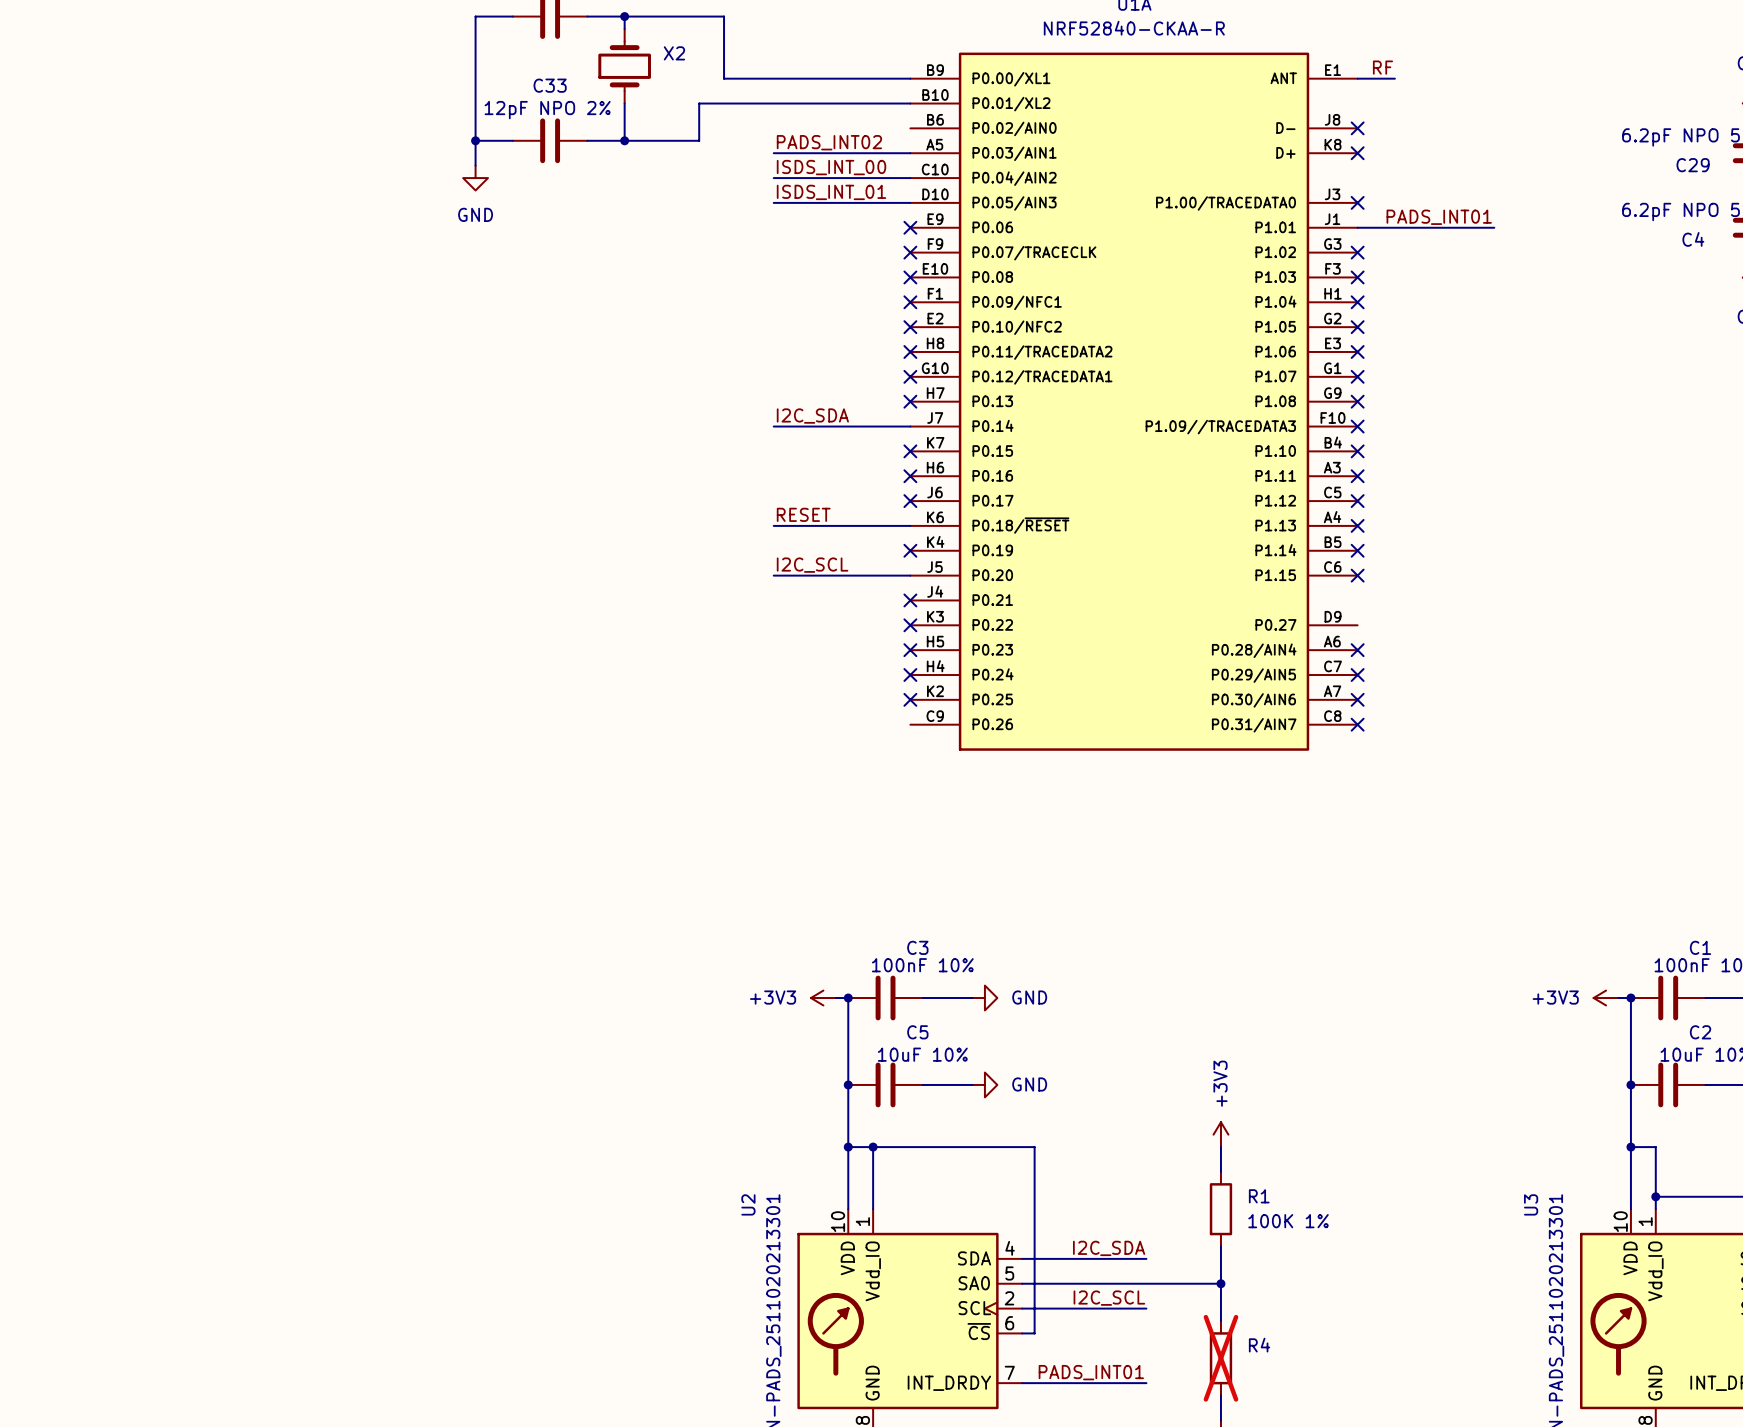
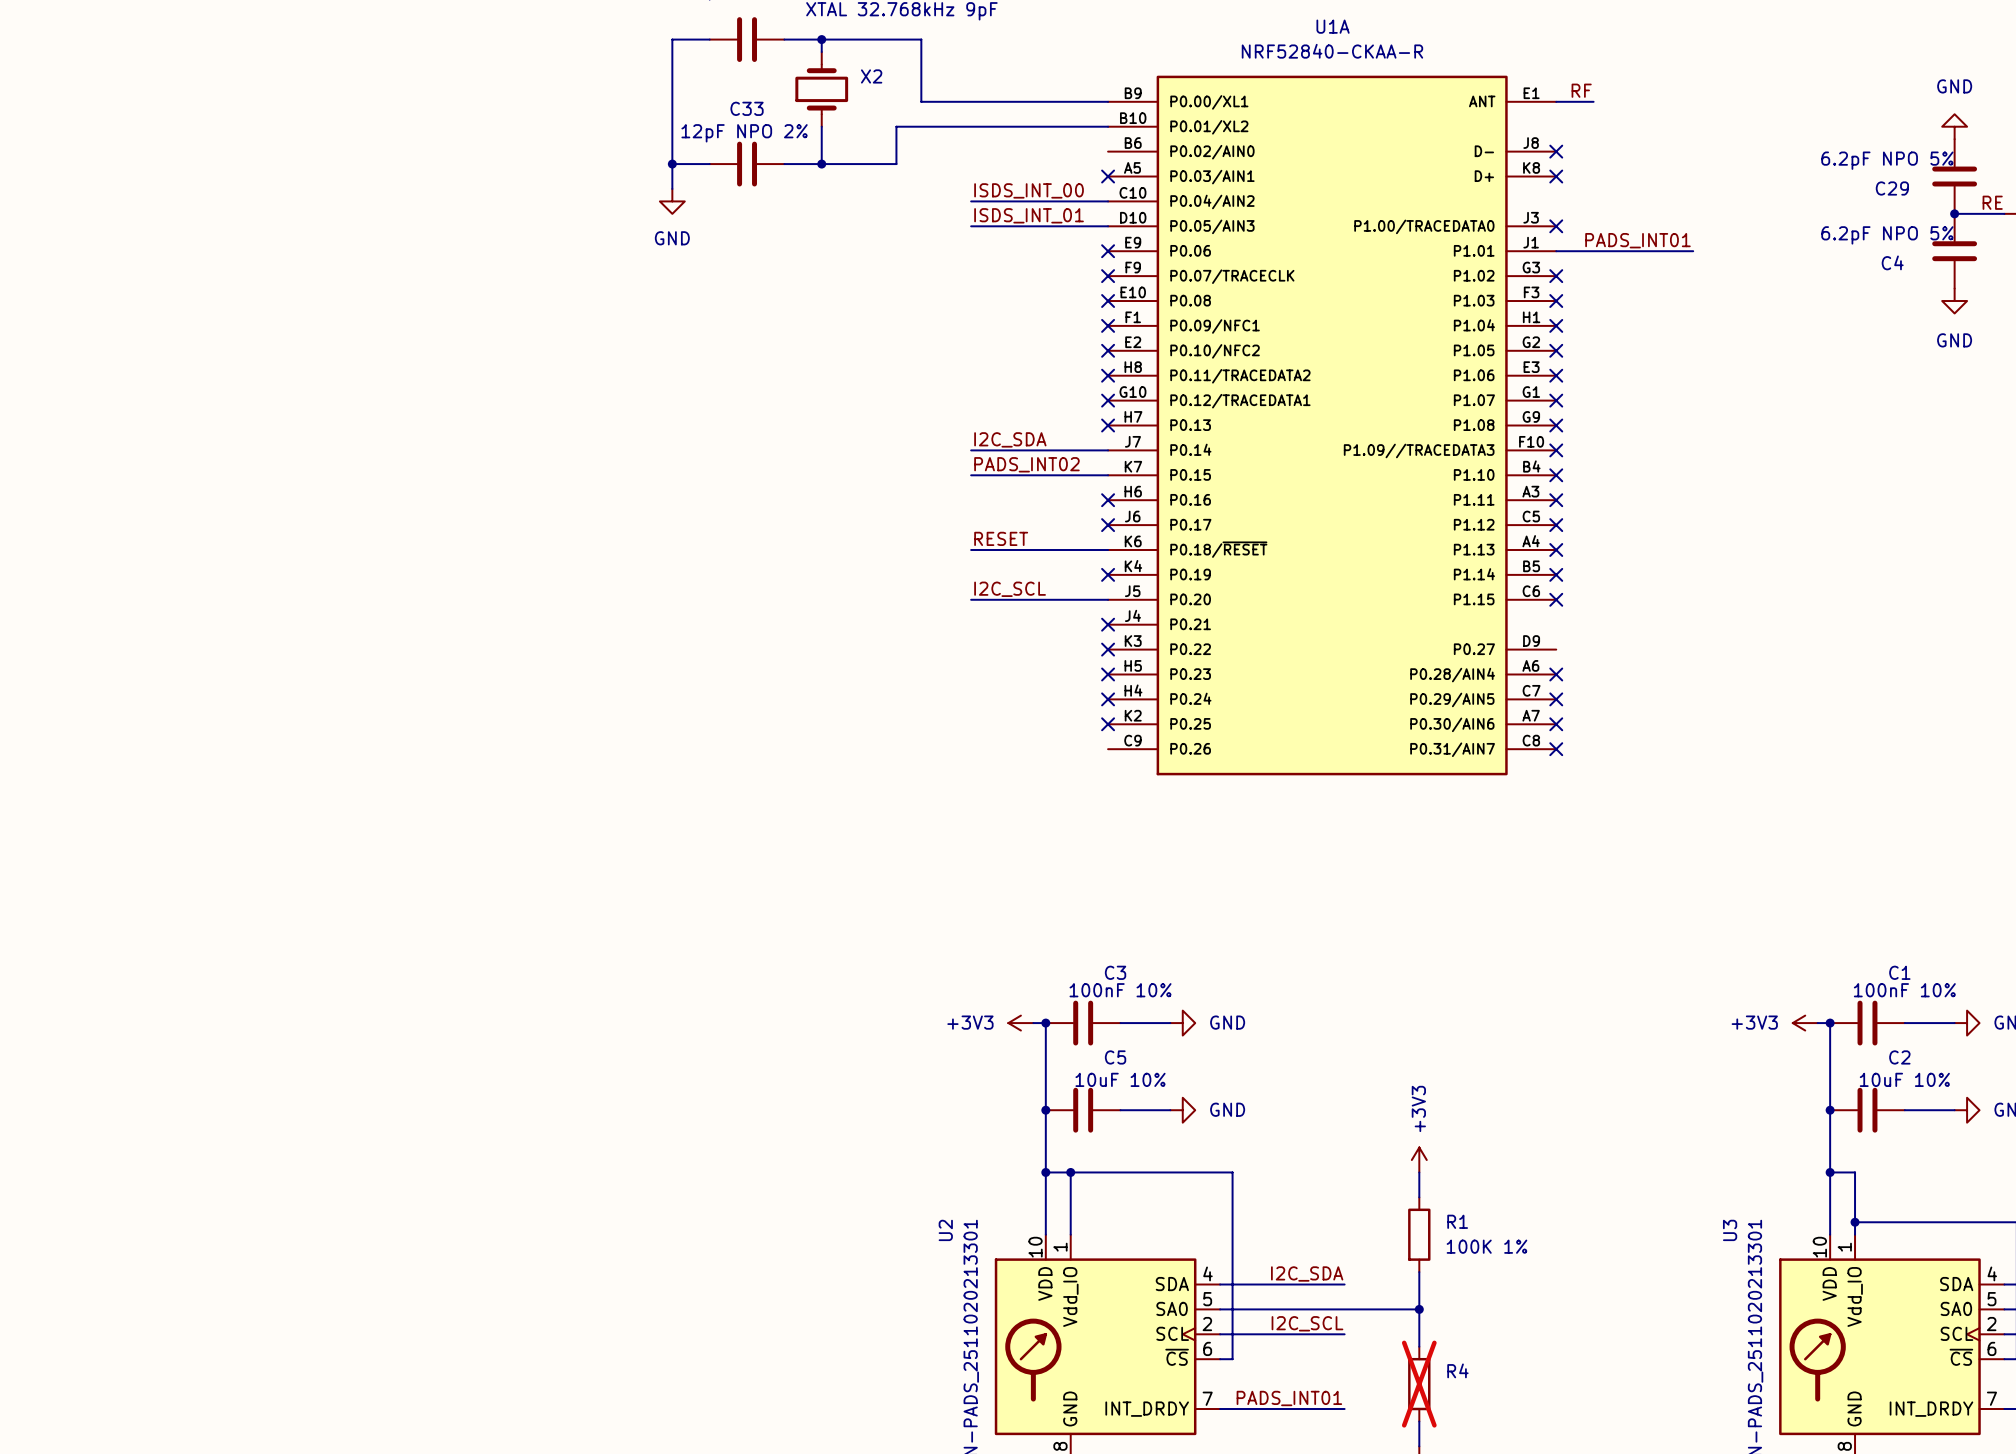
label: PADS_INT02 (829, 142) -> none
wire: (773, 153) (910, 153) -> none
no-connect mark: none -> (1108, 176)
label: none -> PADS_INT02 (1026, 464)
wire: none -> (971, 475) (1108, 475)
no-connect mark: (910, 451) -> none

